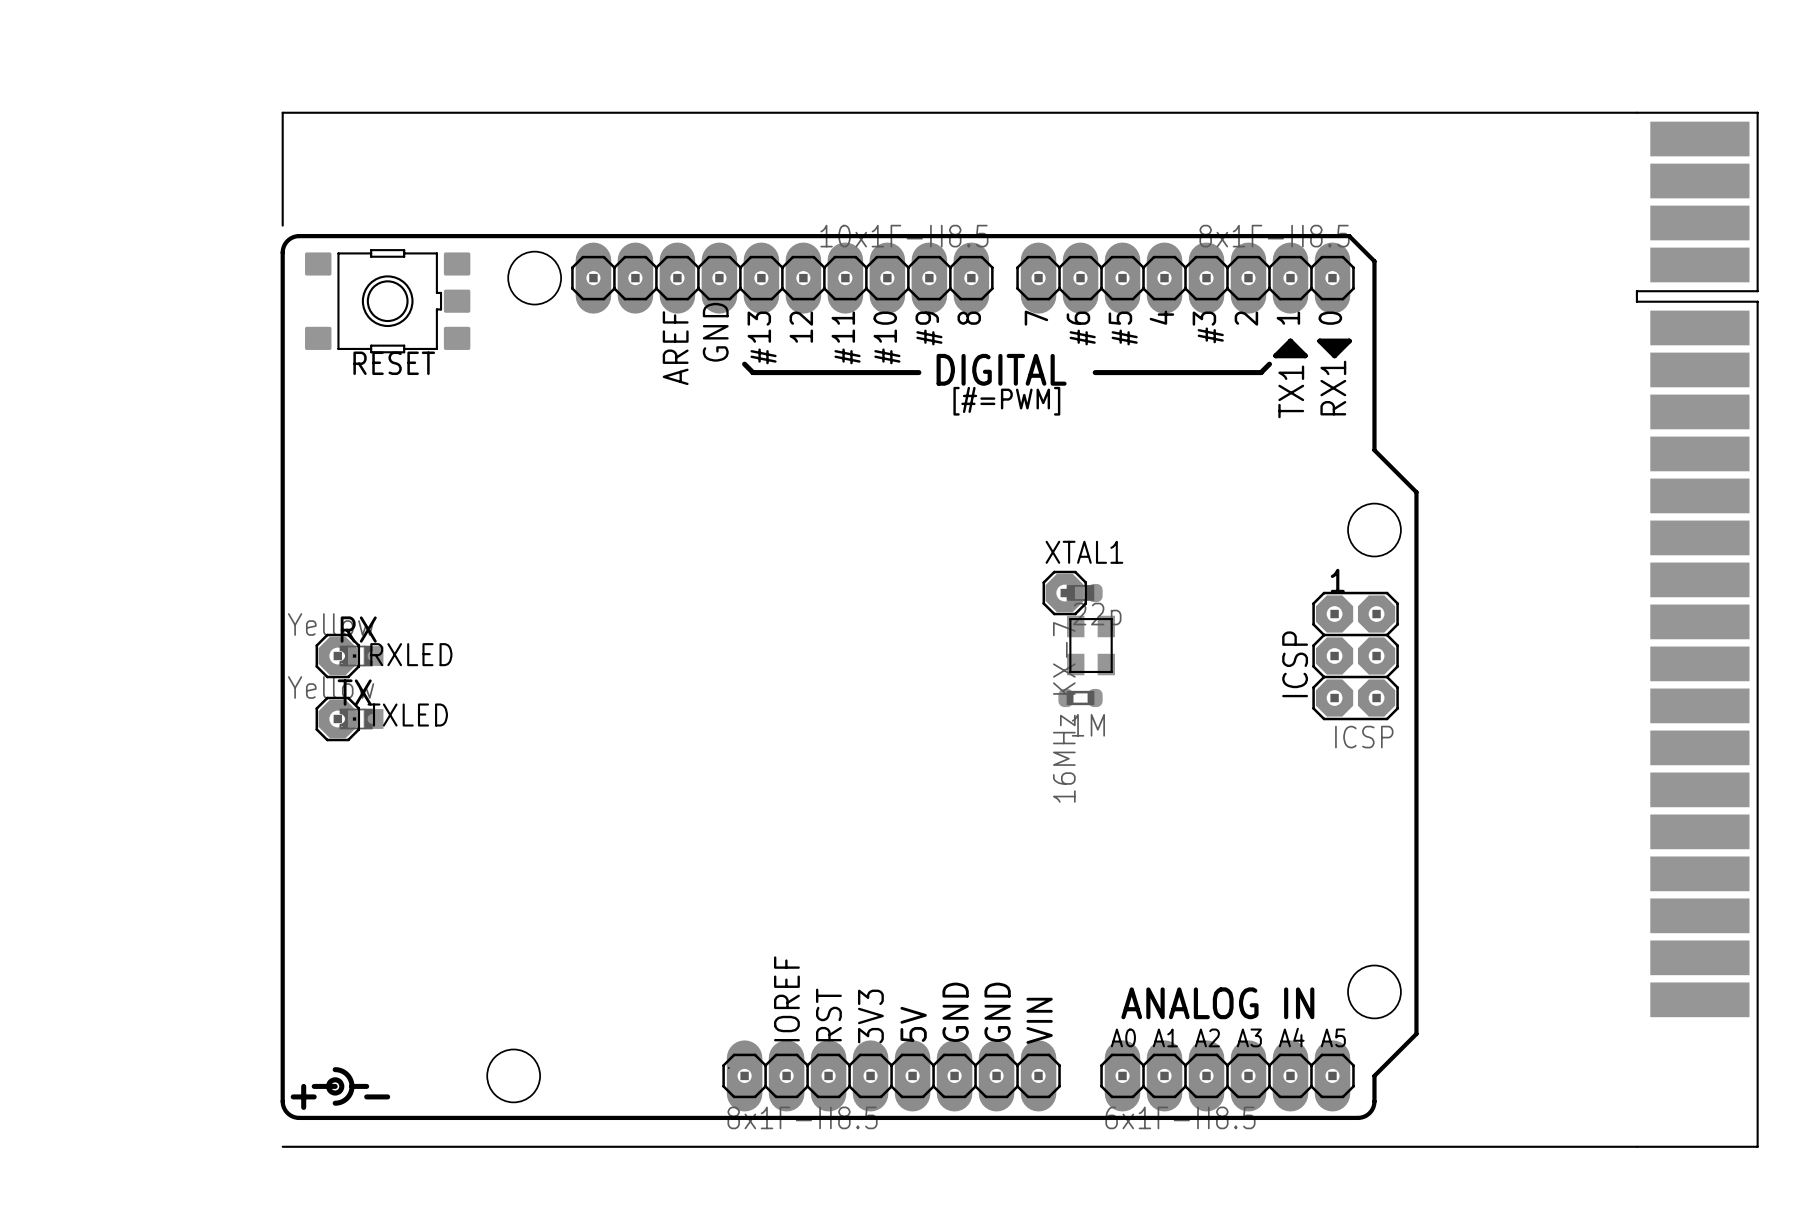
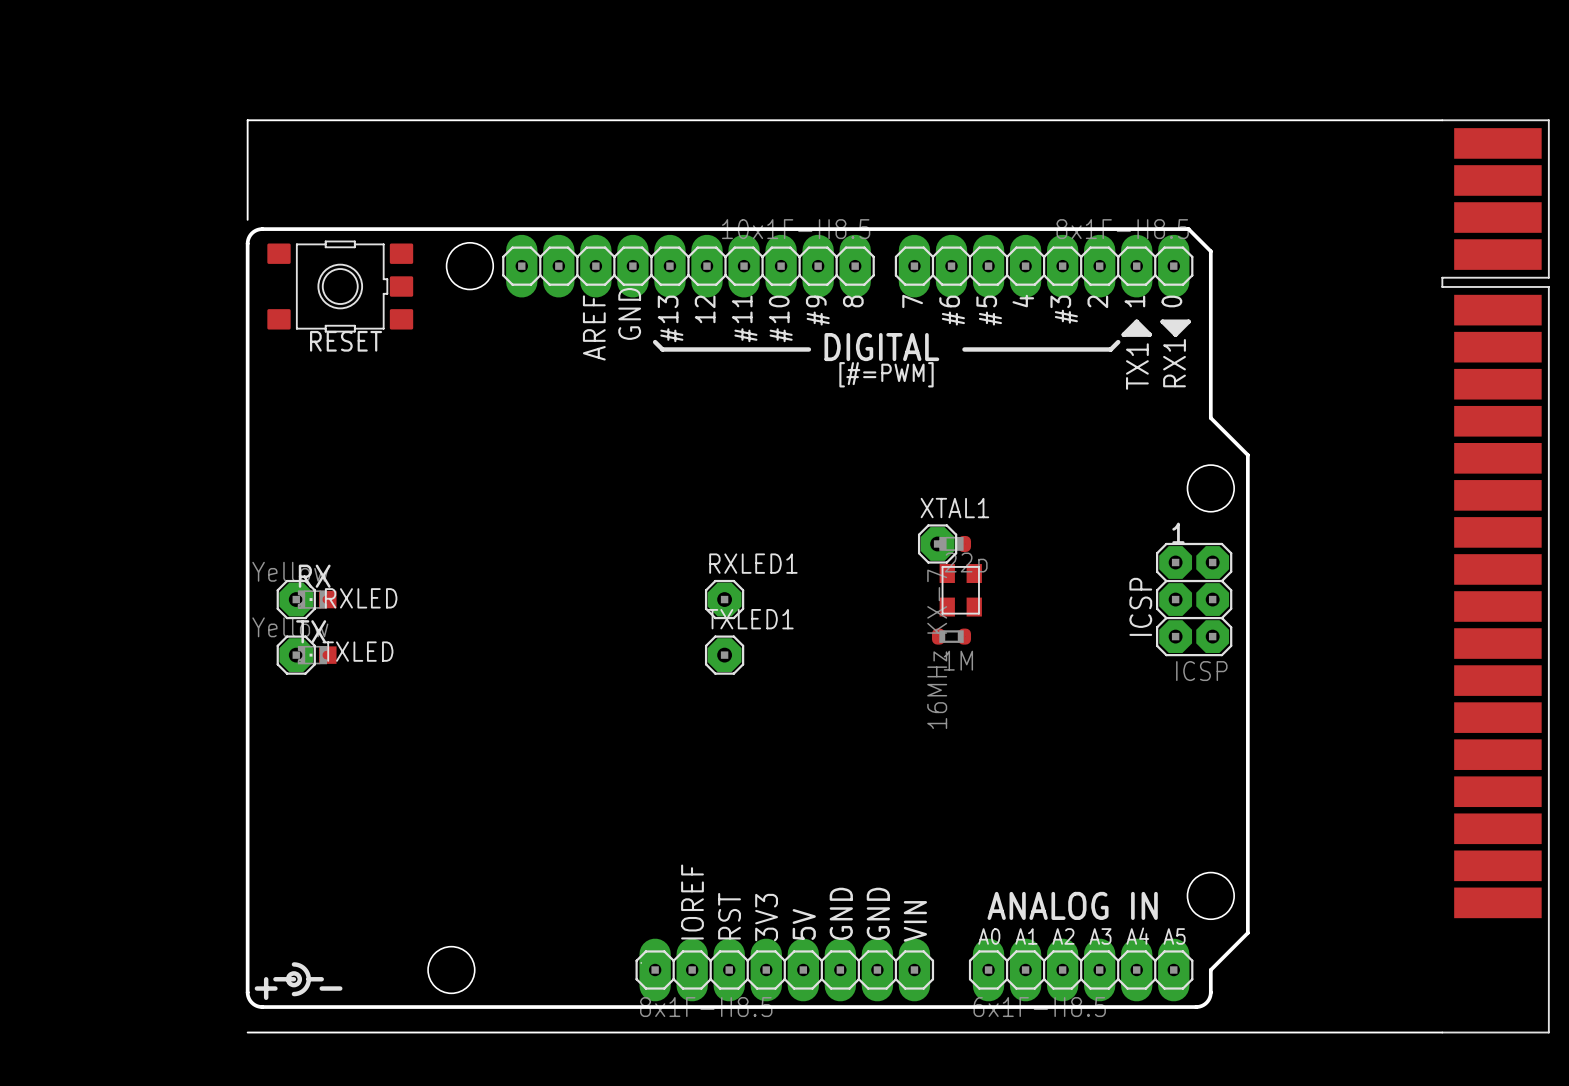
RXLED1: none -> (724, 599)
TXLED1: none -> (724, 655)

